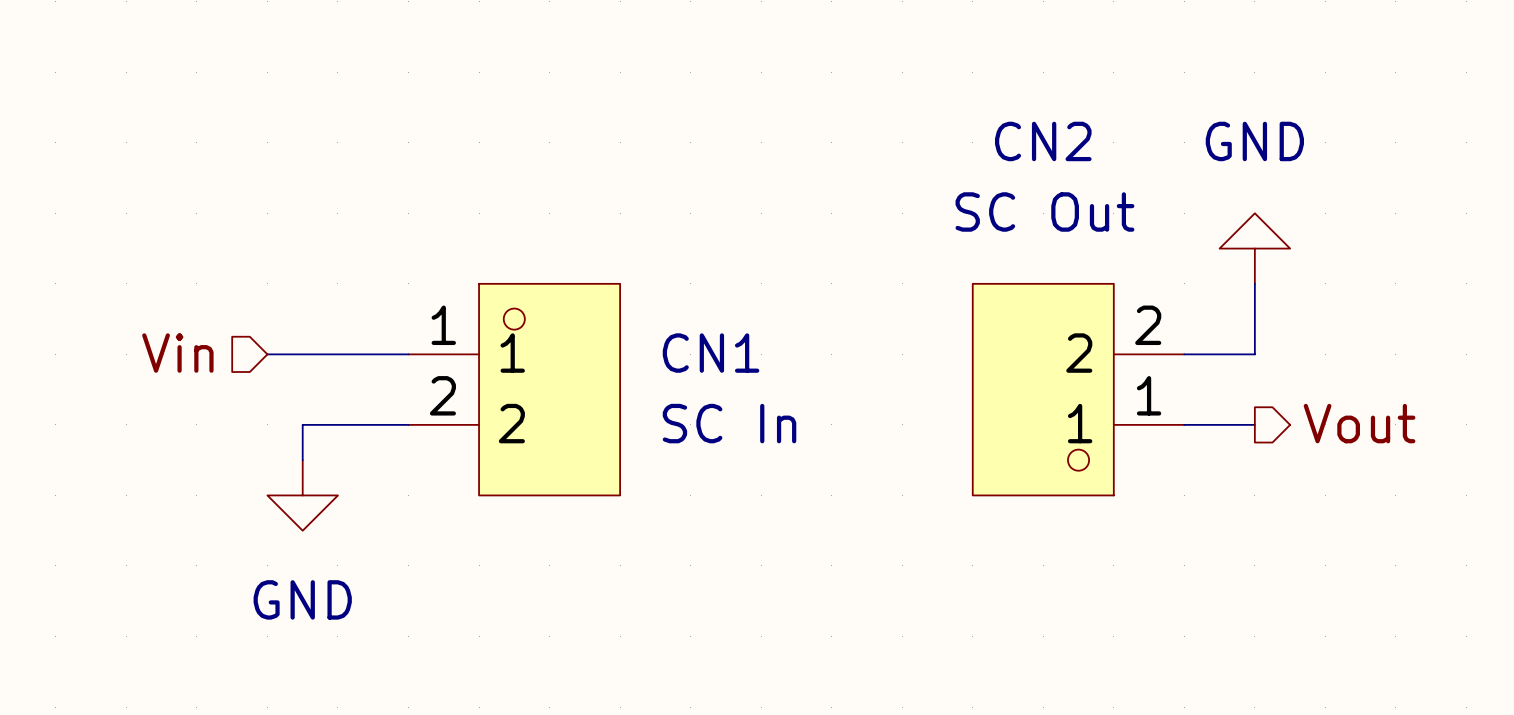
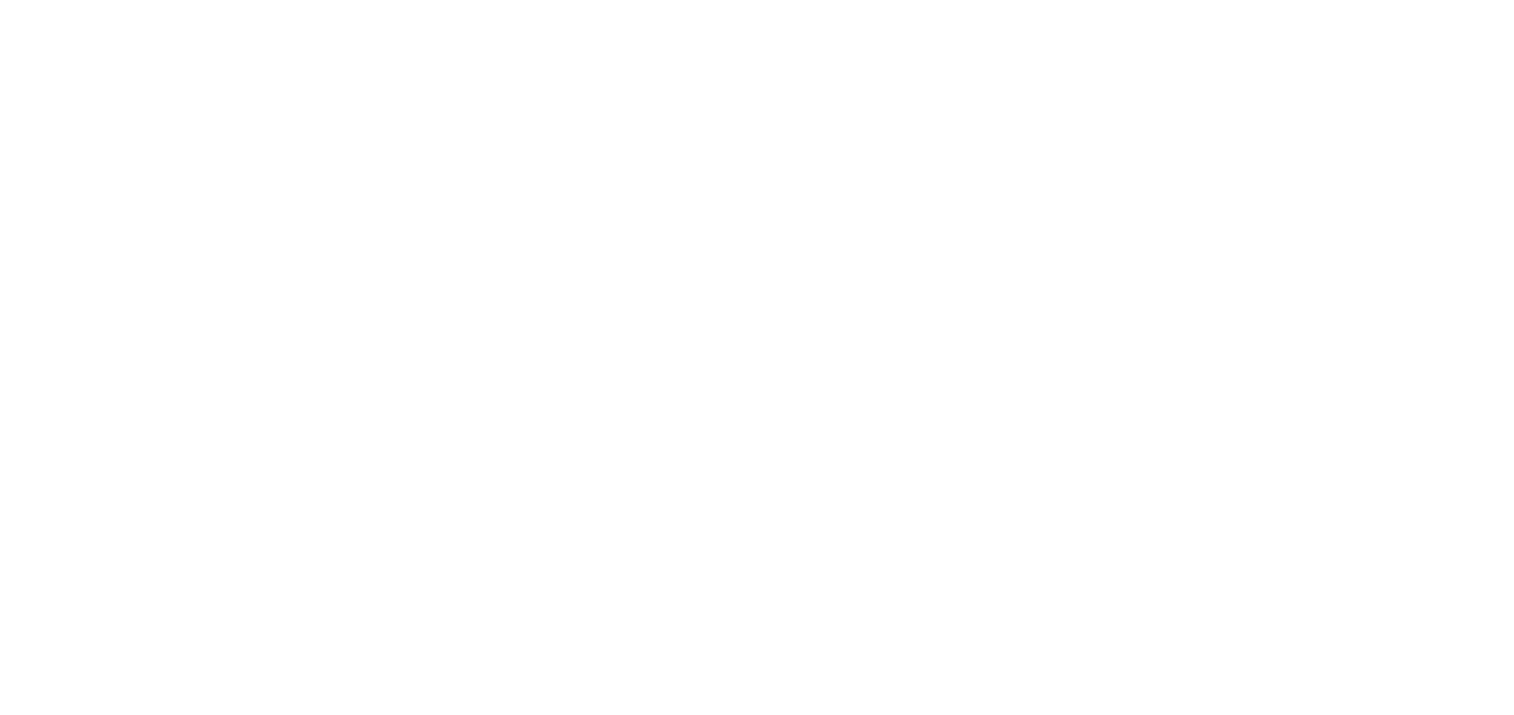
power symbol: GND (1254, 248) -> none
wire: (1254, 283) (1254, 354) (1184, 354) -> none
hierarchical label: Vin (177, 353) -> none
wire: (267, 354) (408, 354) -> none
CN1: SC In (514, 389) -> none
CN2: SC Out (1078, 389) -> none
hierarchical label: Vout (1359, 423) -> none
wire: (408, 424) (302, 424) (302, 460) -> none
wire: (1184, 424) (1254, 424) -> none
power symbol: GND (302, 495) -> none

